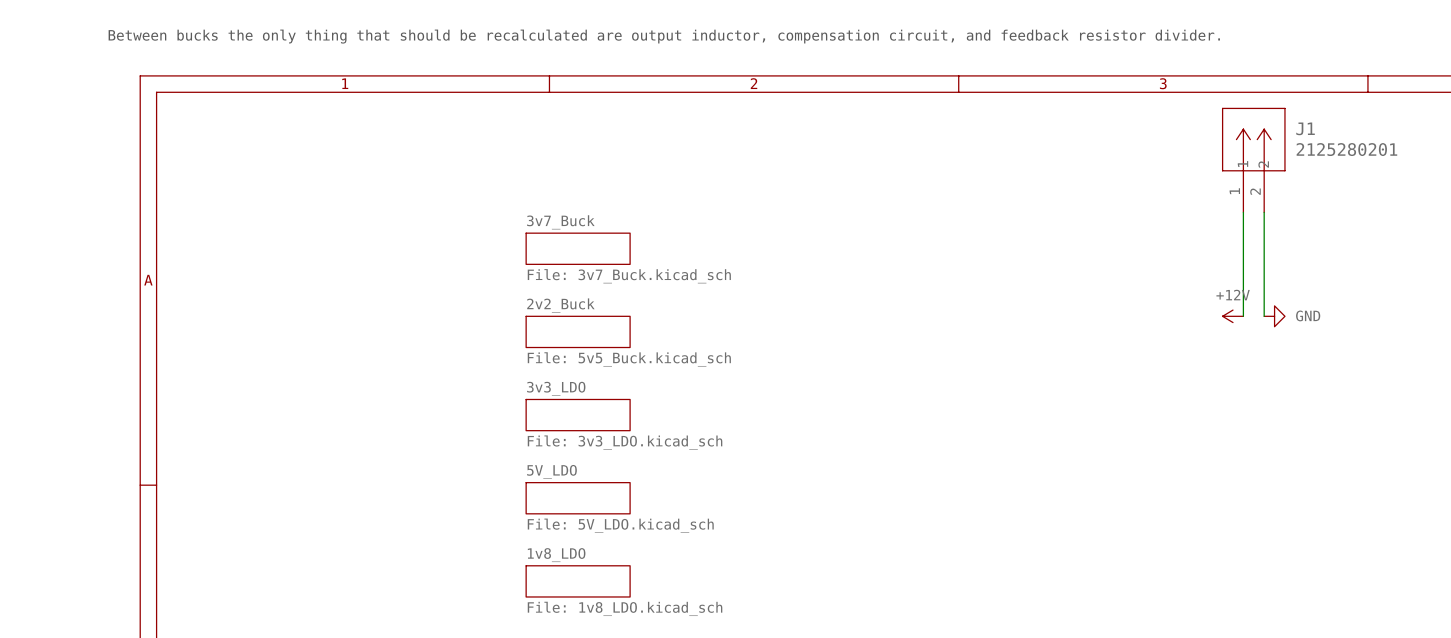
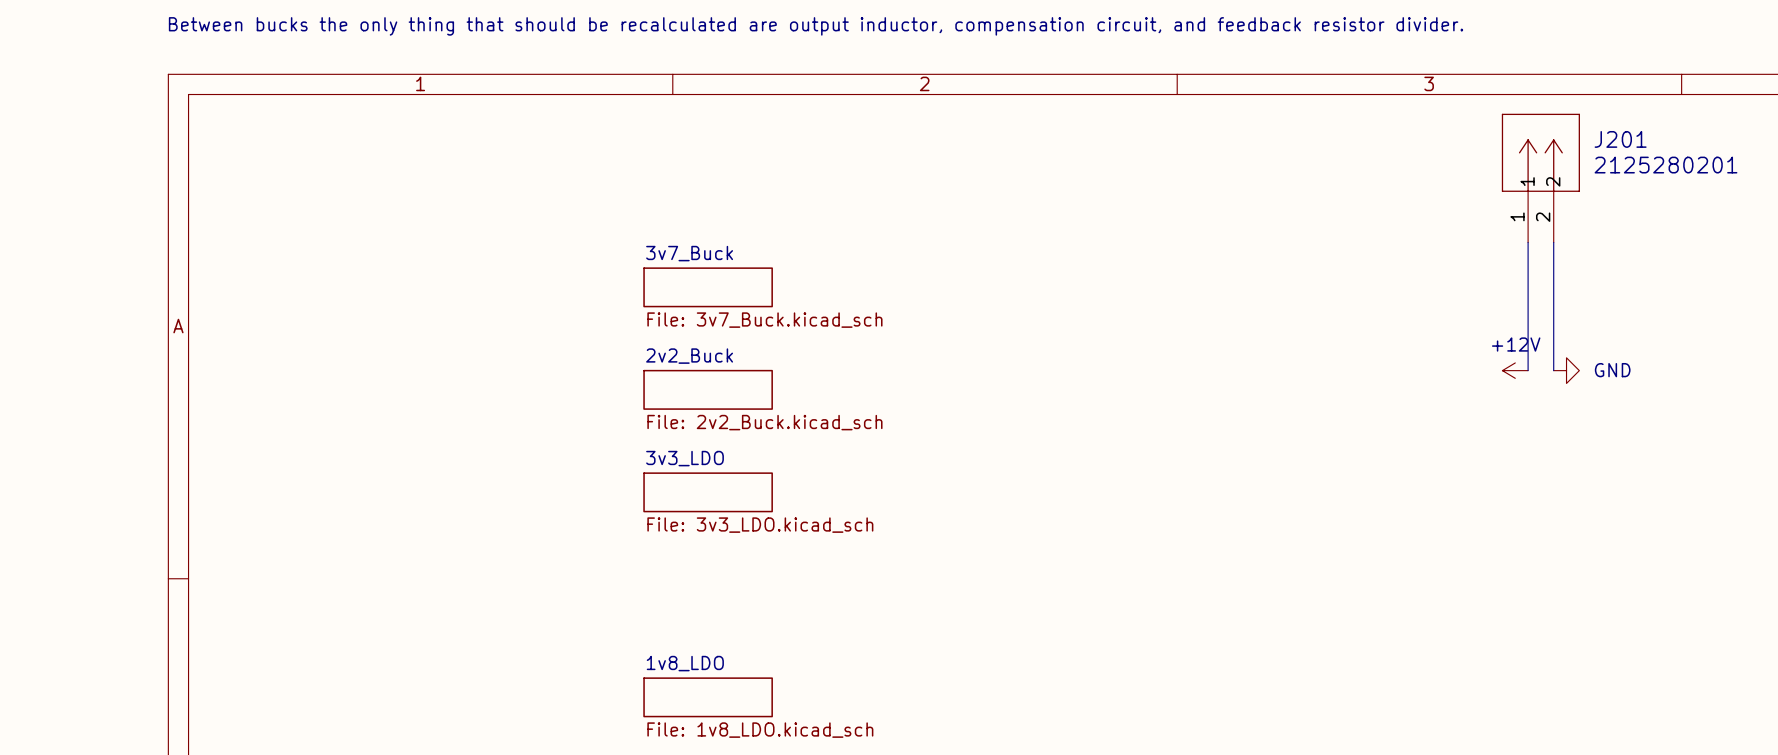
J1 name: J1 (1305, 128) -> J201 (1620, 139)
sheet 2v2_Buck value: File: 5v5_Buck.kicad_sch (629, 359) -> File: 2v2_Buck.kicad_sch (764, 422)
sheet 5V_LDO: File: 5V_LDO.kicad_sch (578, 498) -> none

